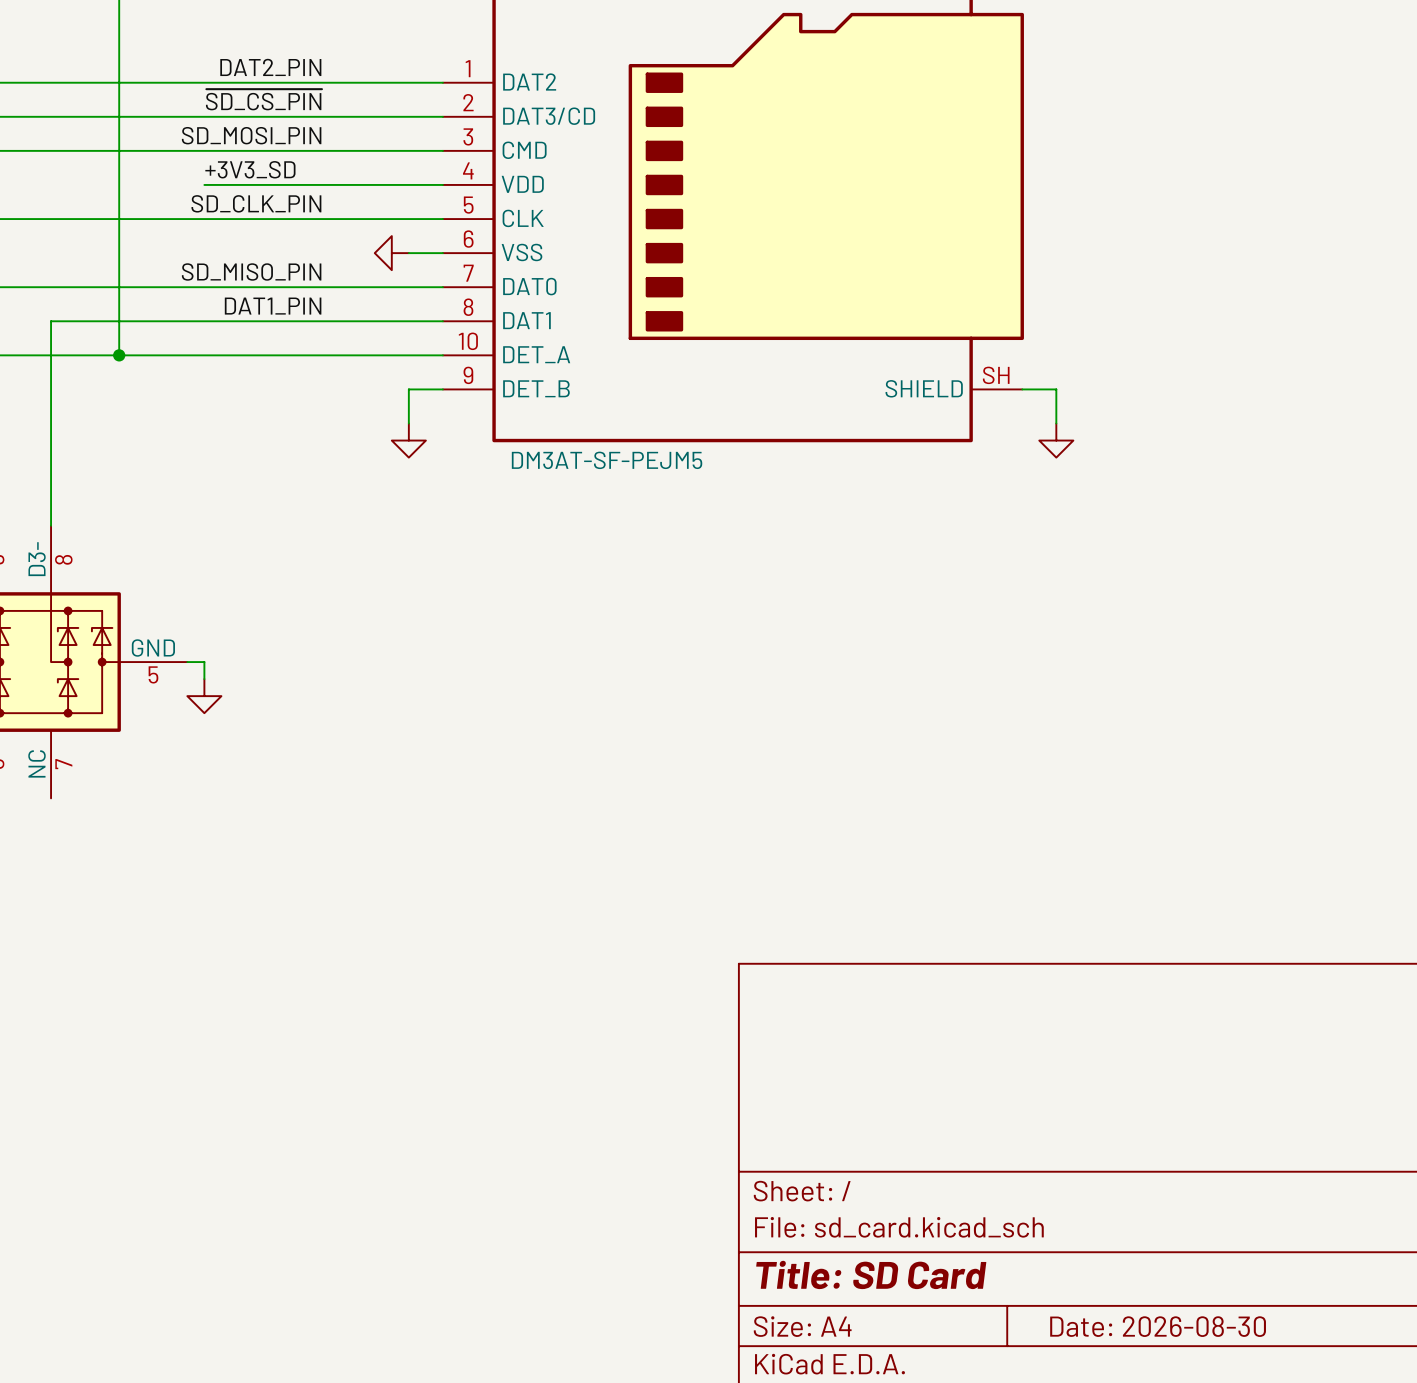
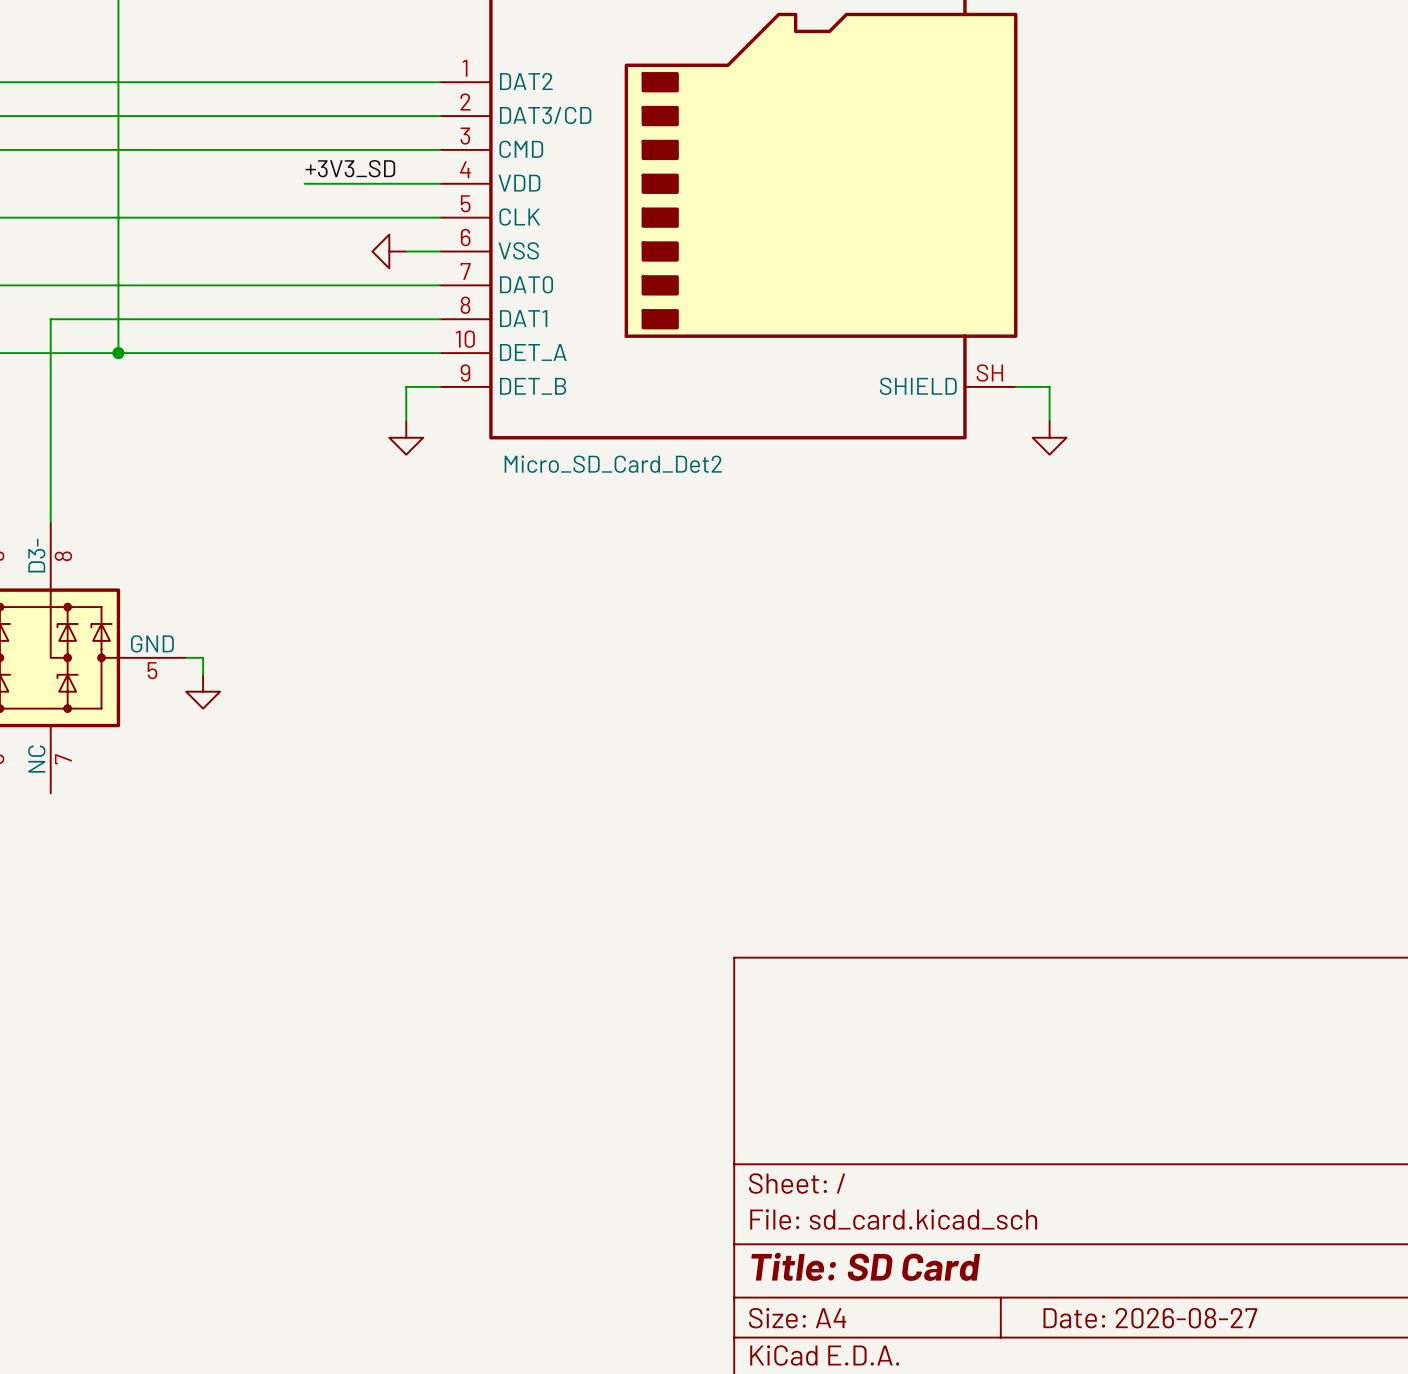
label: DAT2_PIN (270, 67) -> none
label: ~{SD_CS_PIN} (263, 99) -> none
label: SD_MOSI_PIN (251, 135) -> none
label position: +3V3_SD (250, 169) -> +3V3_SD (350, 168)
wire: (204, 184) (306, 184) -> none
label: SD_CLK_PIN (256, 203) -> none
label: SD_MISO_PIN (251, 271) -> none
label: DAT1_PIN (273, 306) -> none
part value: DM3AT-SF-PEJM5 (607, 460) -> Micro_SD_Card_Det2 (613, 464)
title block: Date: 2026-08-30 (1158, 1326) -> Date: 2026-08-27 (1150, 1318)

